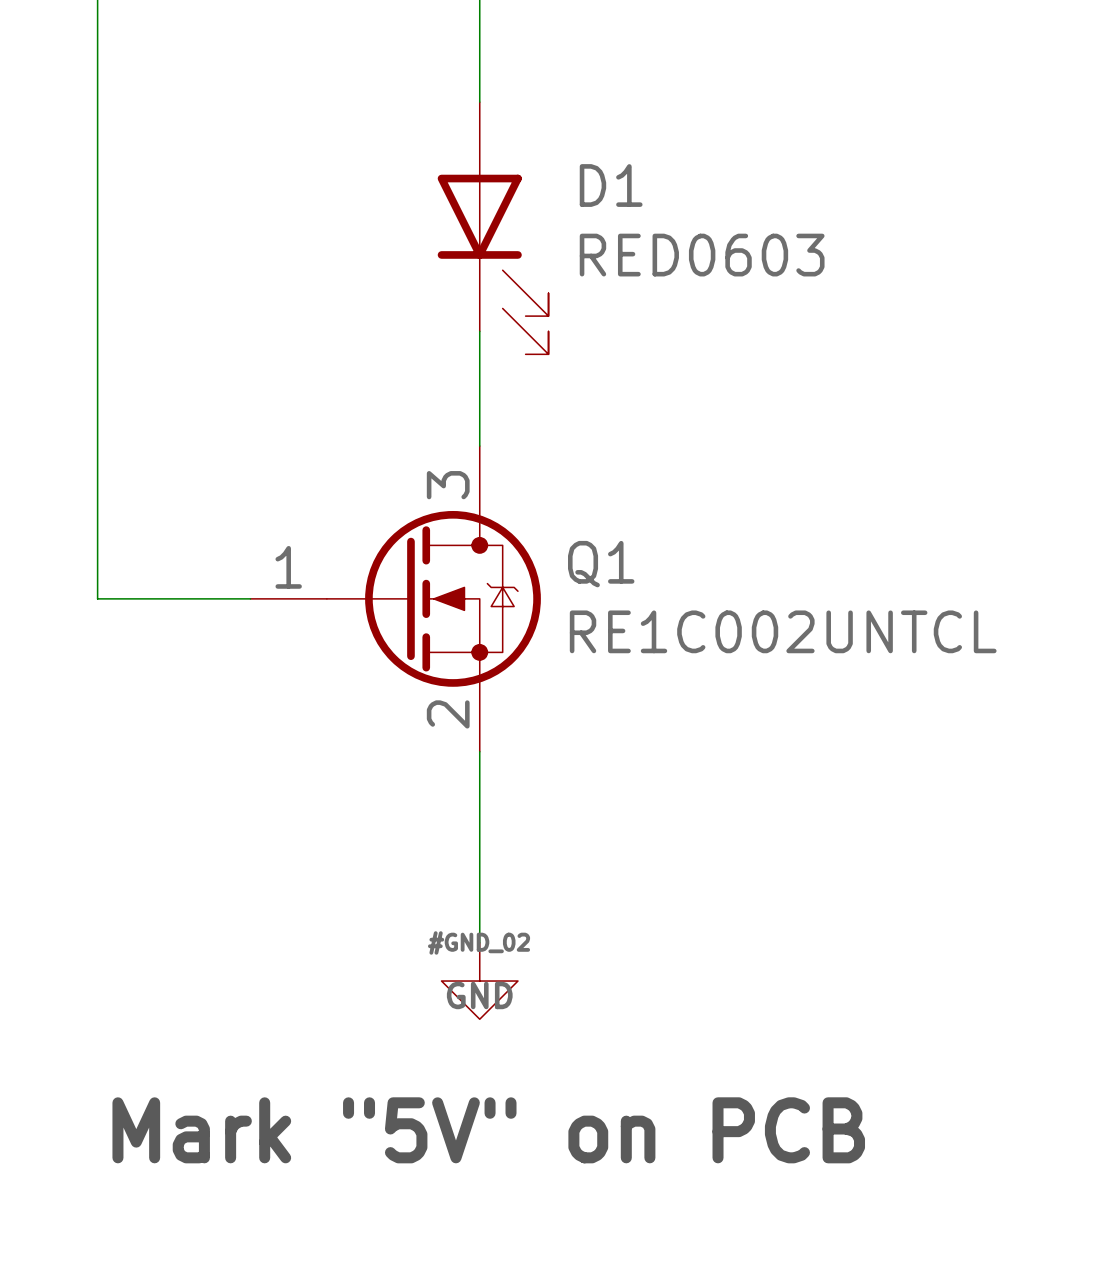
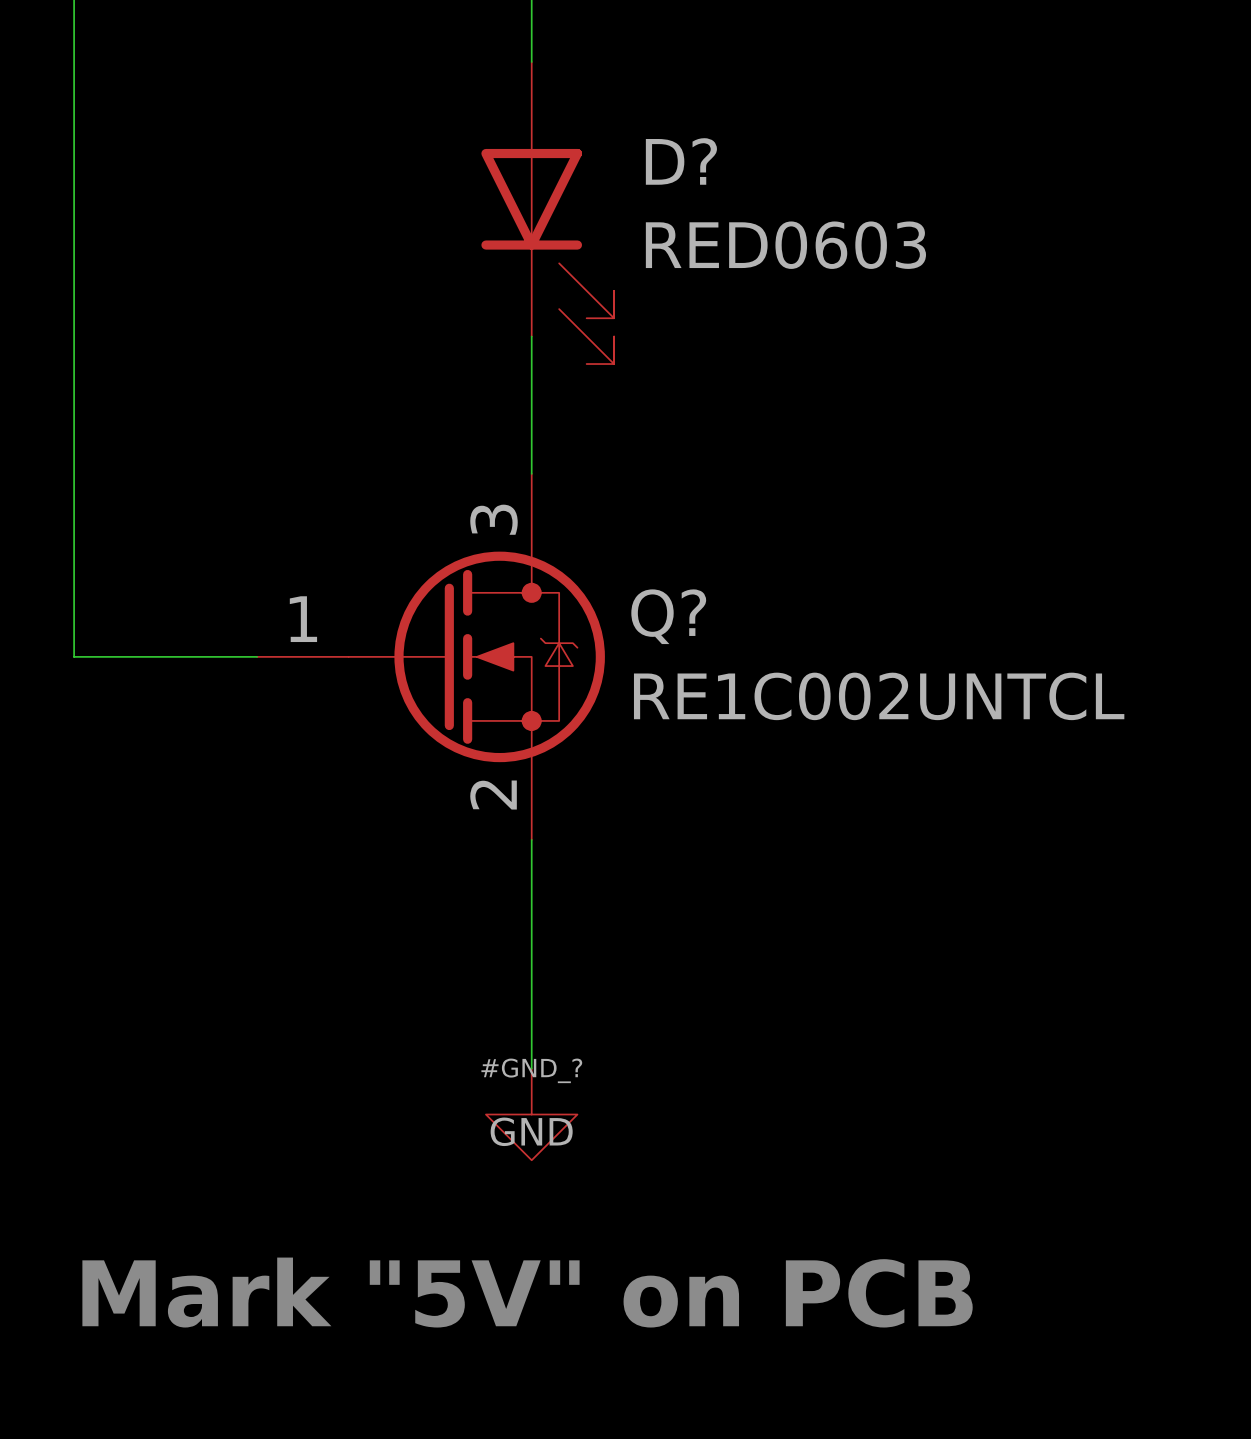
D1 name: D1 (611, 185) -> D? (681, 161)
Q1 name: Q1 (601, 564) -> Q? (668, 616)
#GND_02 name: #GND_02 (479, 942) -> #GND_? (531, 1070)

